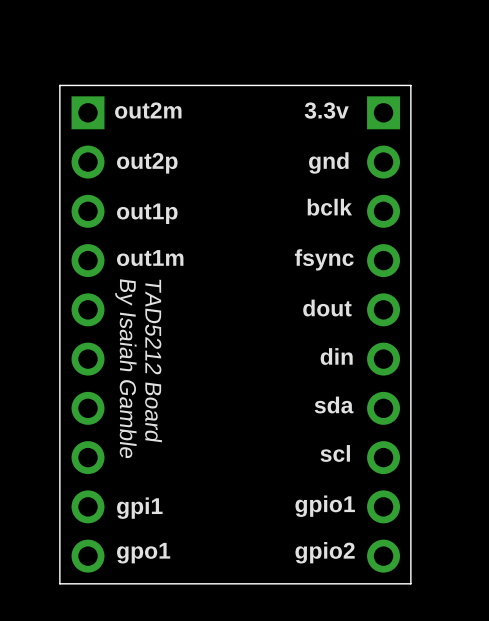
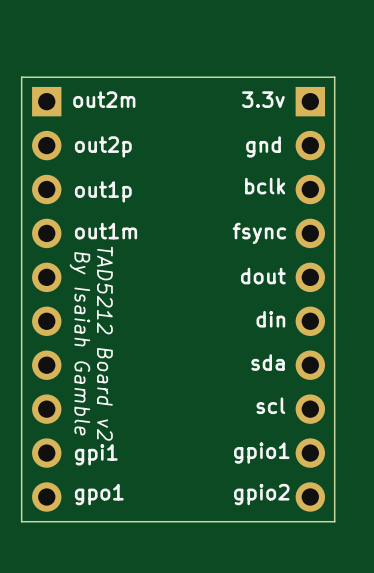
text: TAD5212 Board (153, 360) -> TAD5212 Board v2 (104, 343)

